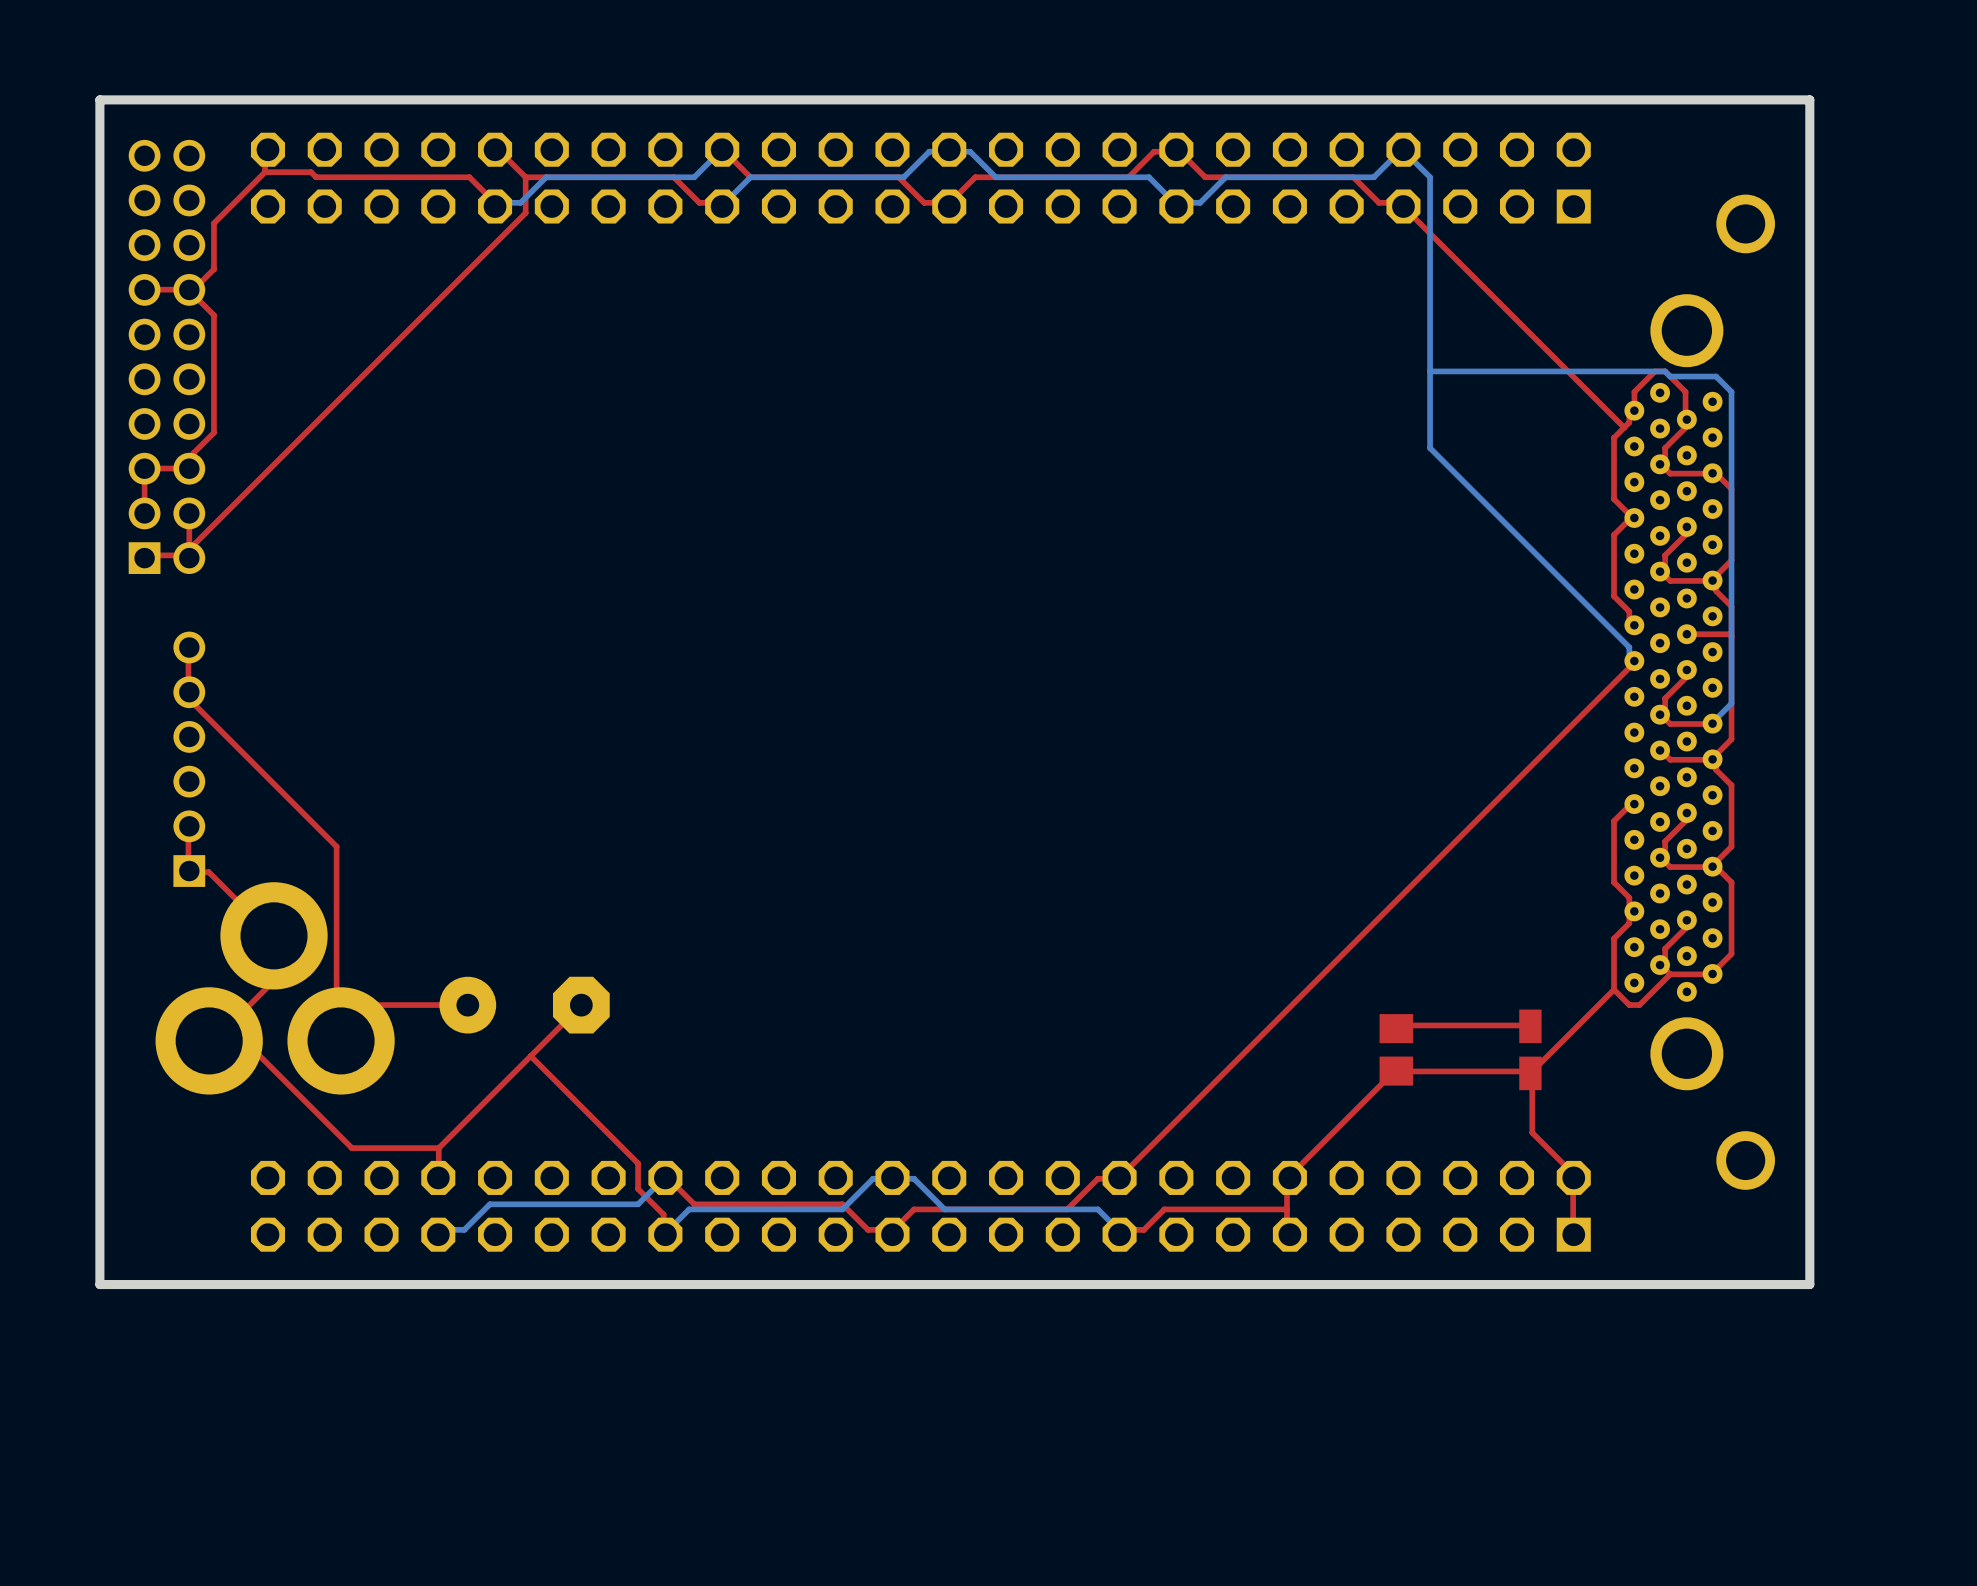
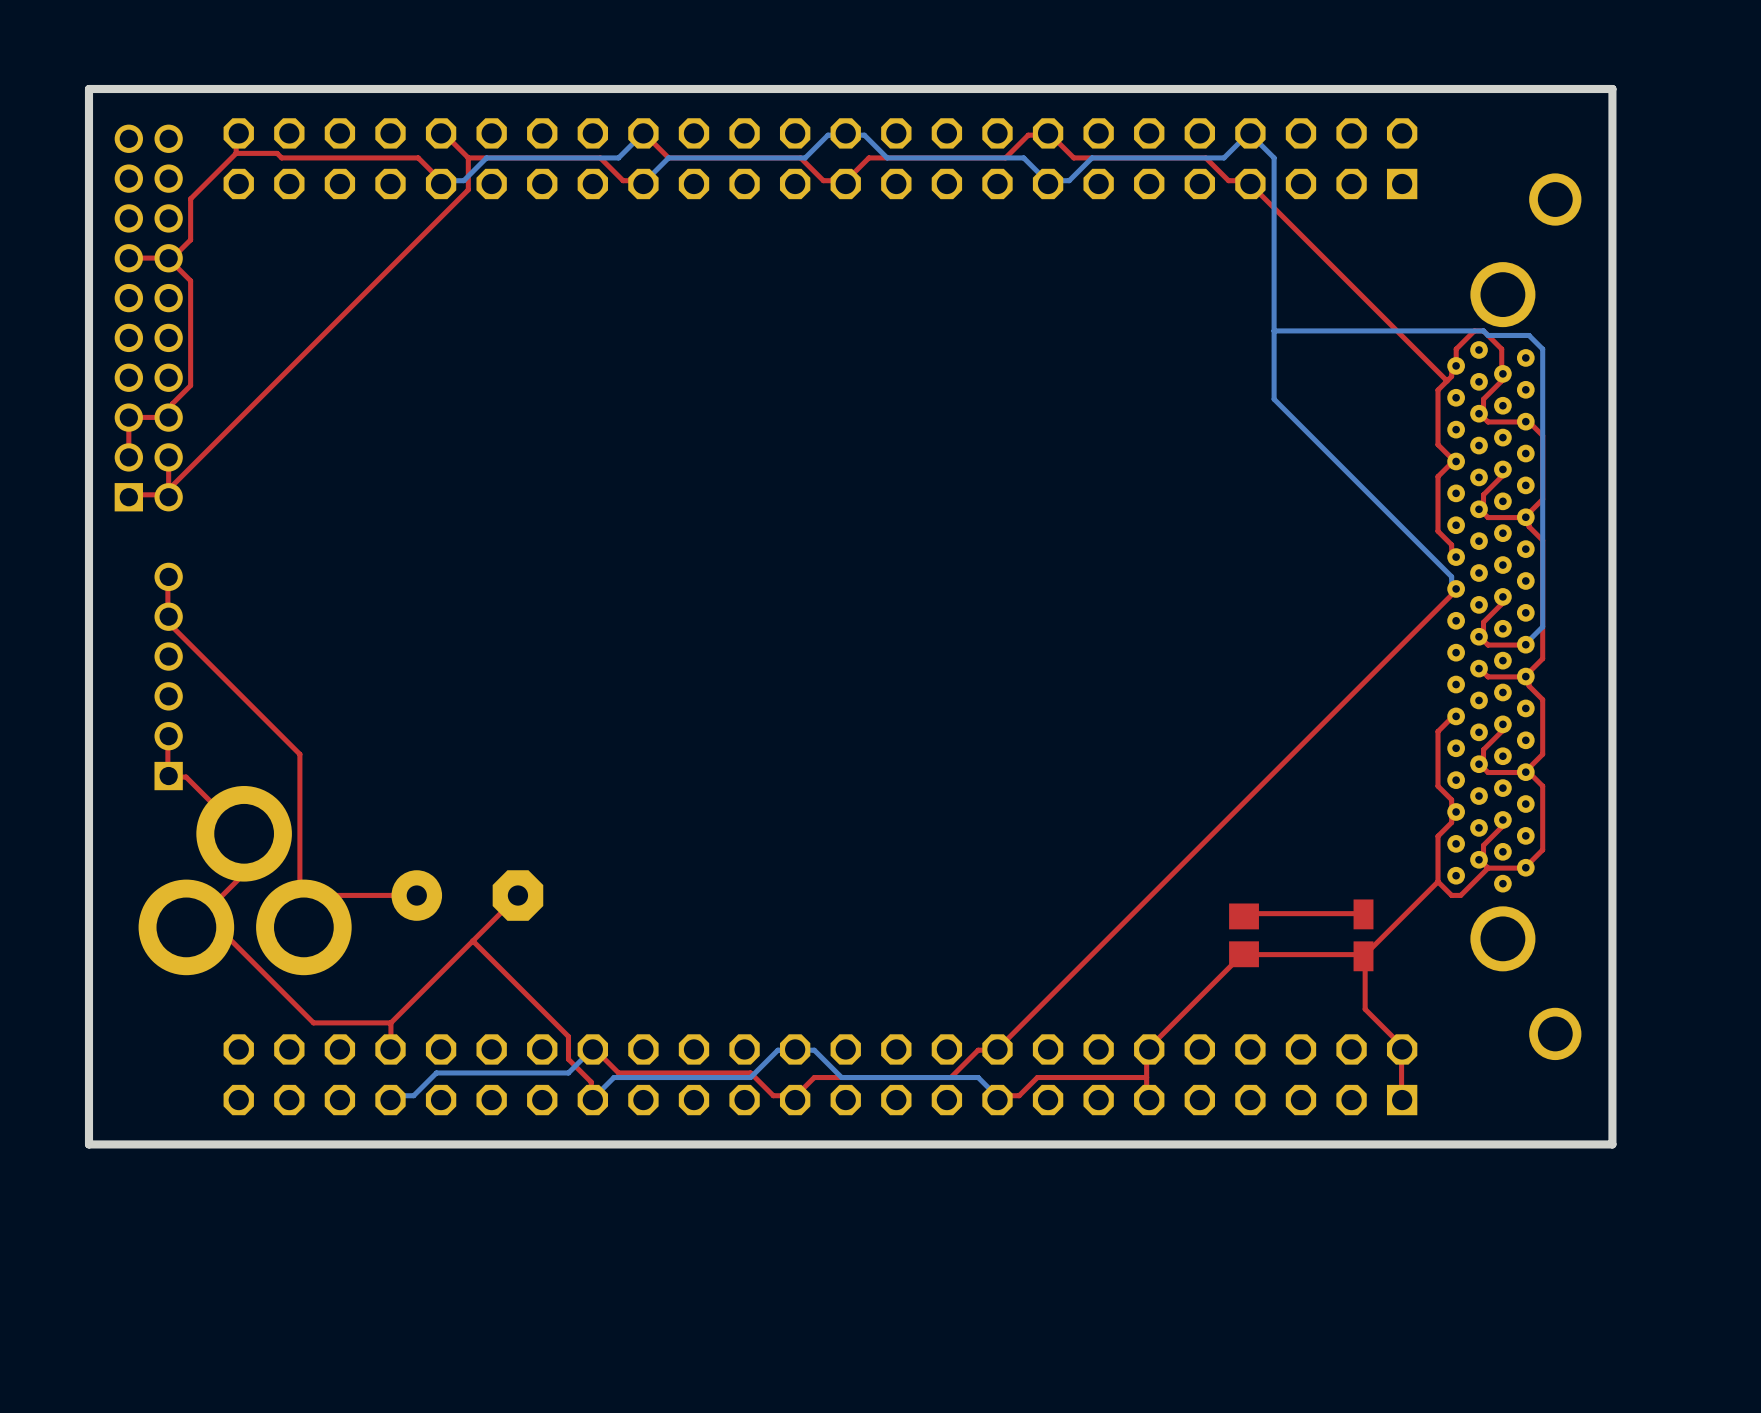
top track: (1686, 634) (1729, 634) (1731, 636) -> none

